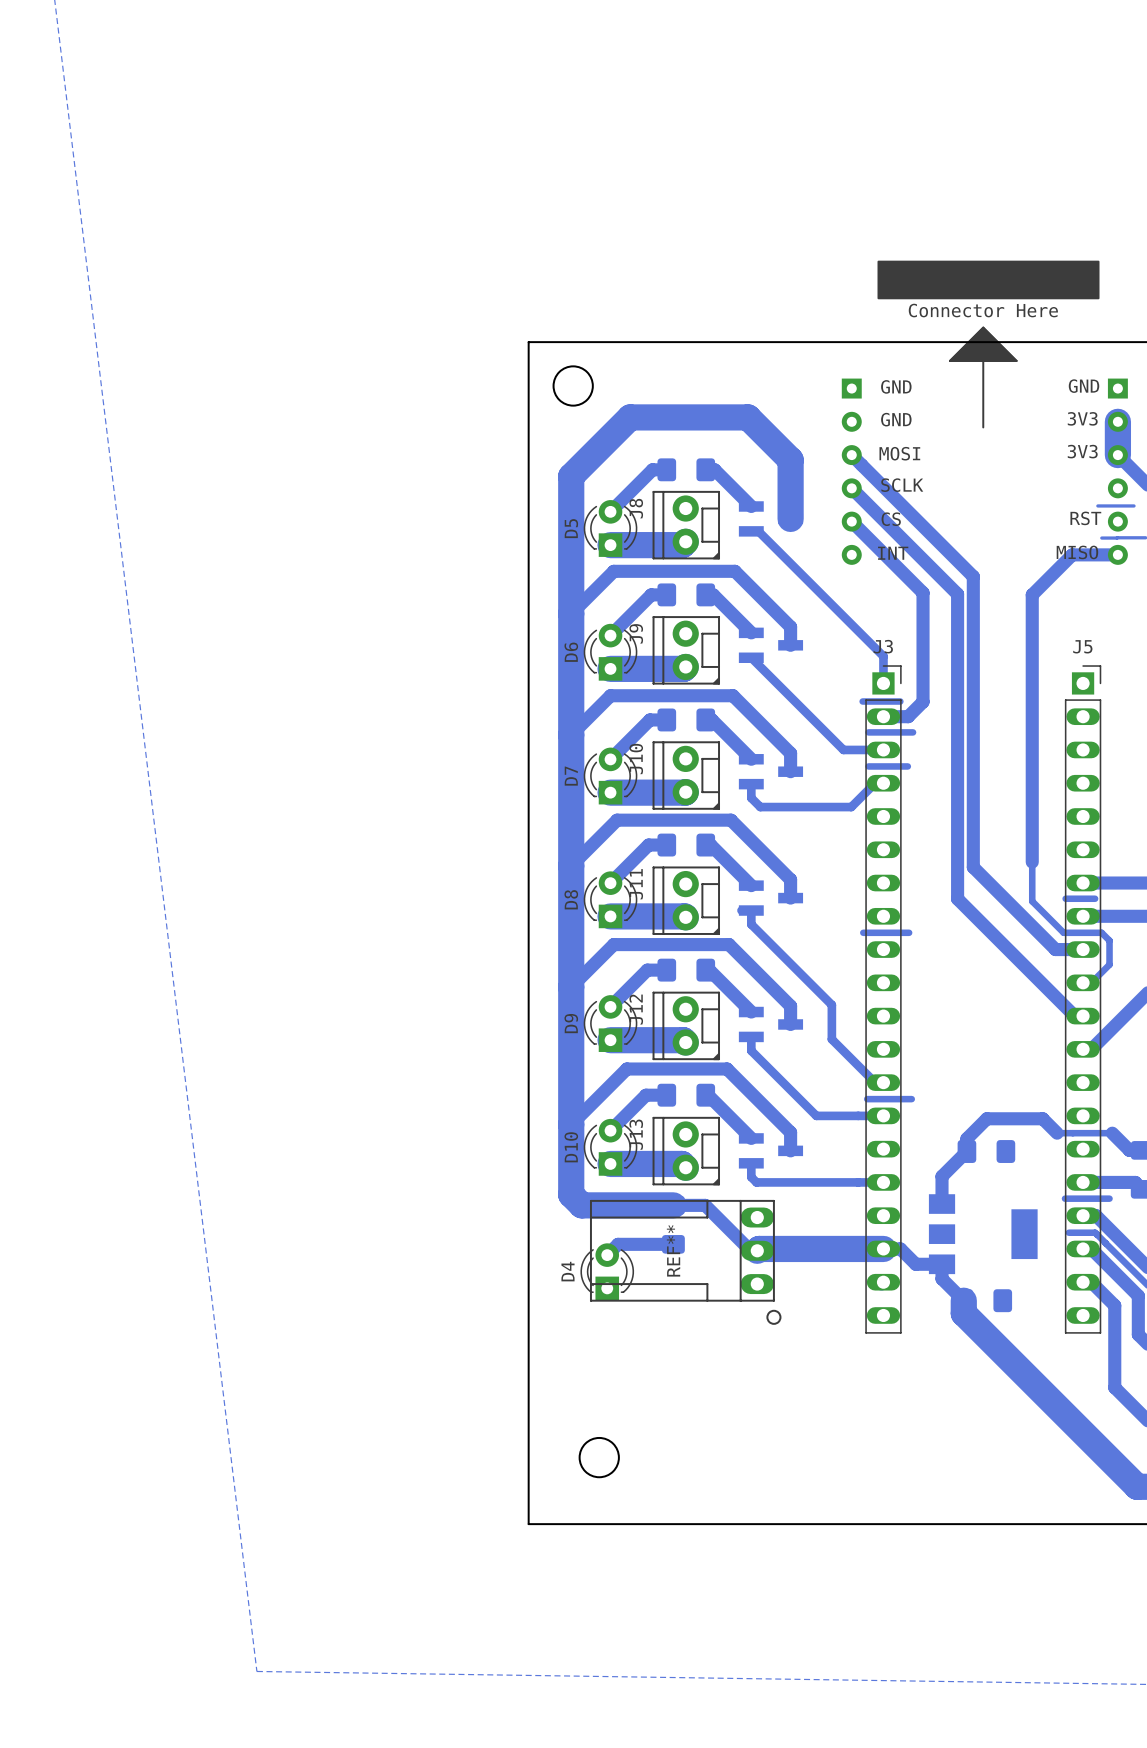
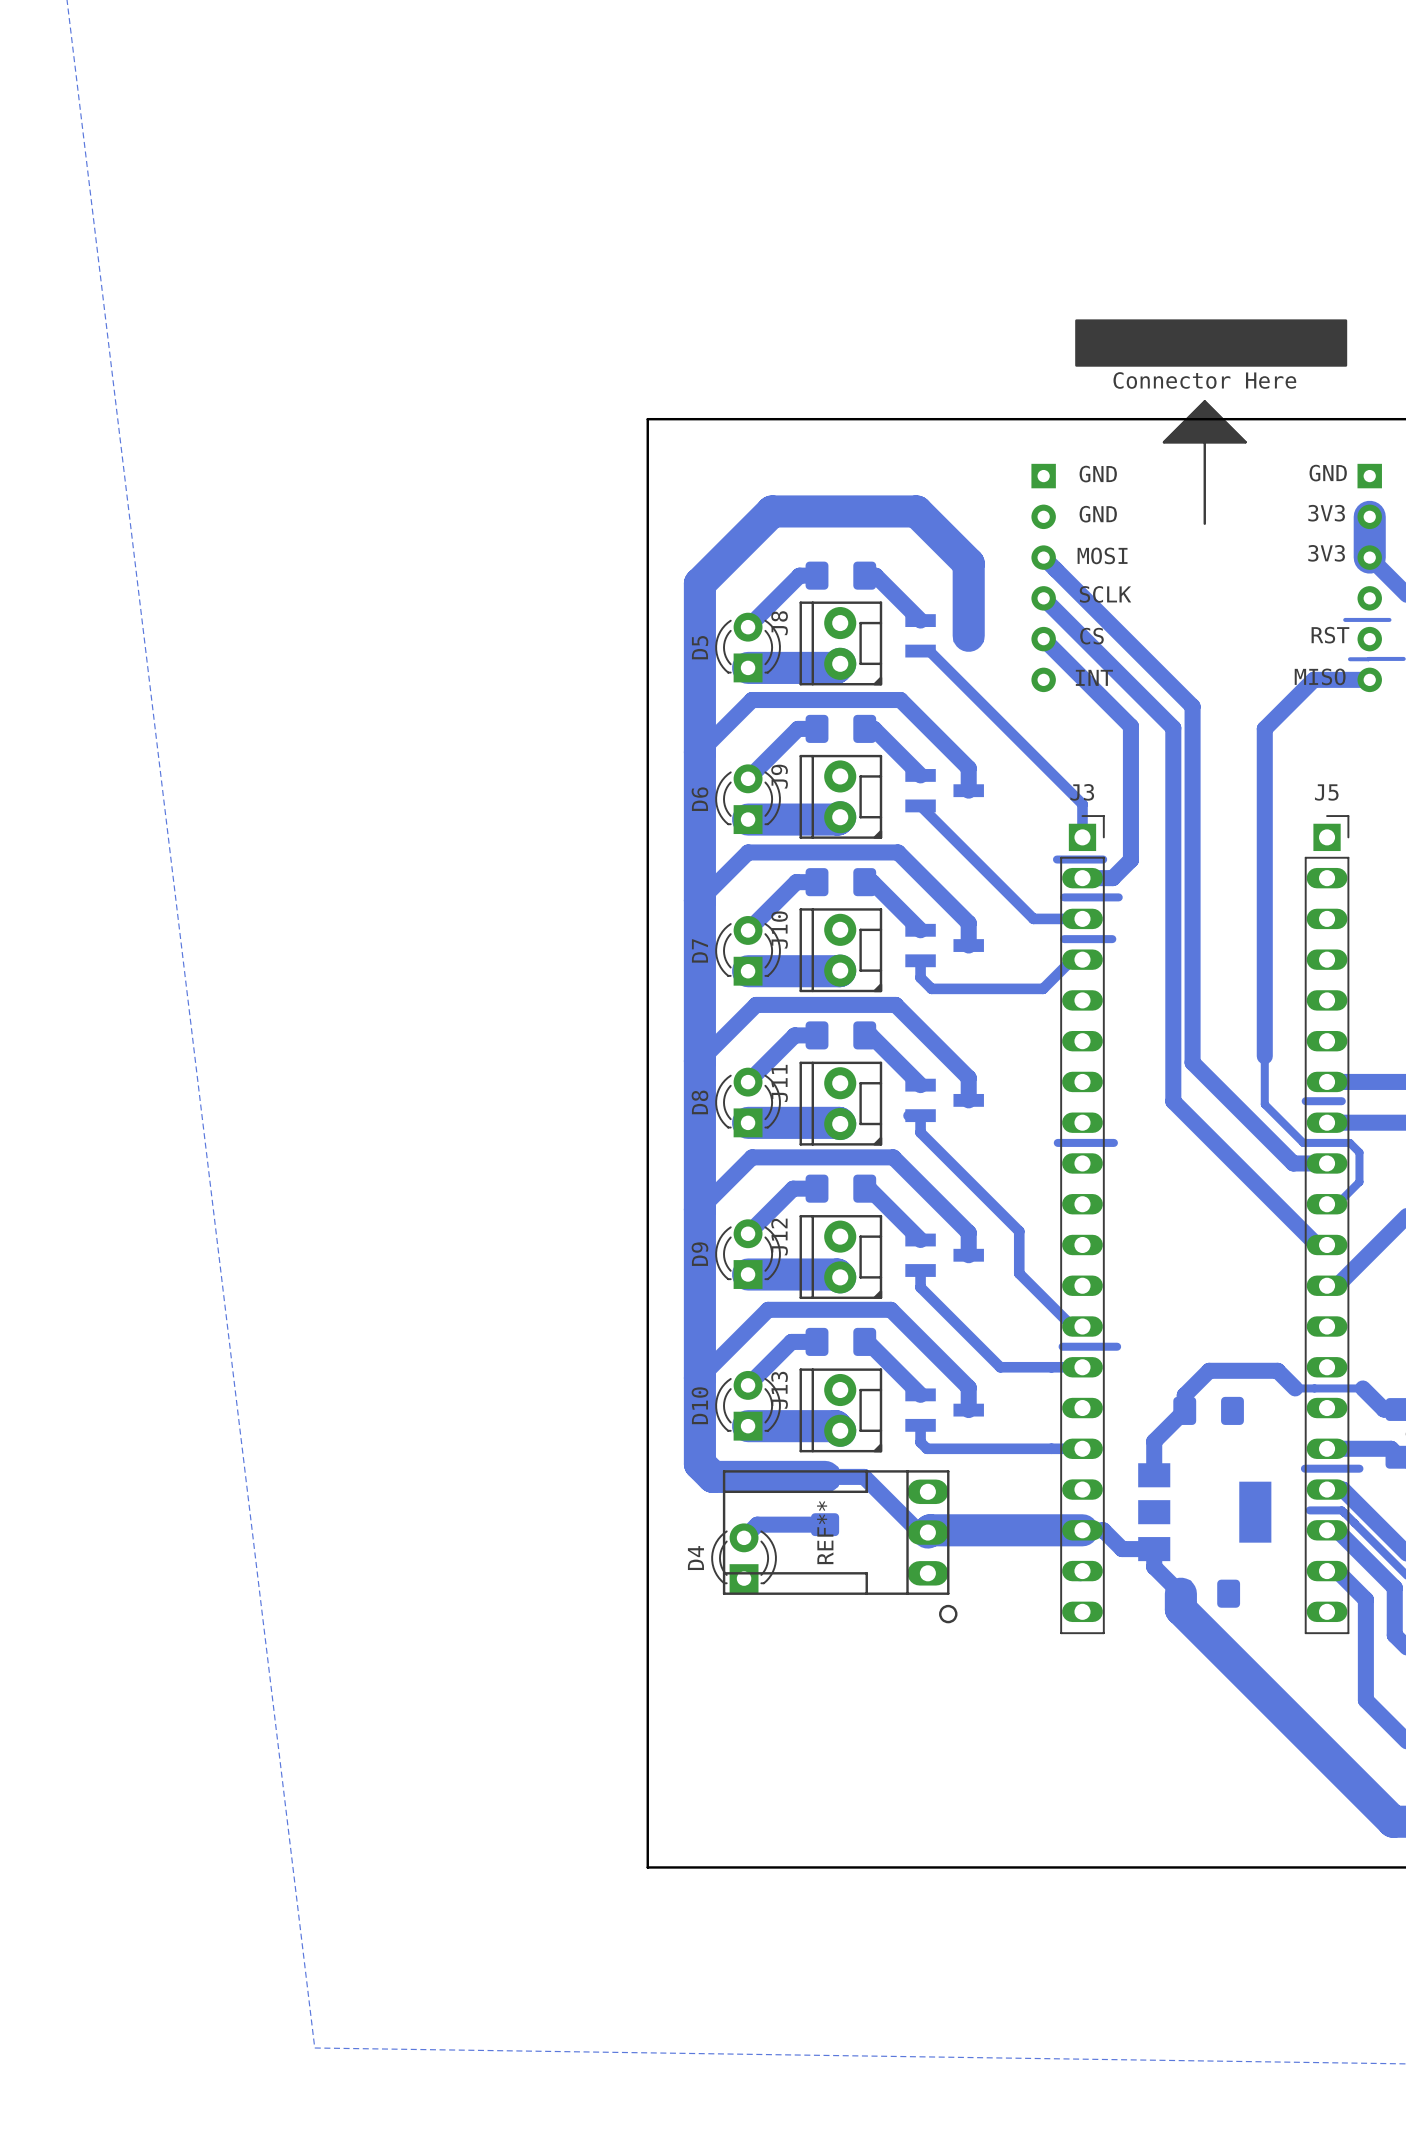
round board edge: [552, 365, 594, 407] -> none
round board edge: [578, 1436, 620, 1479] -> none

